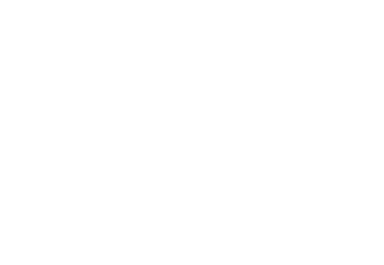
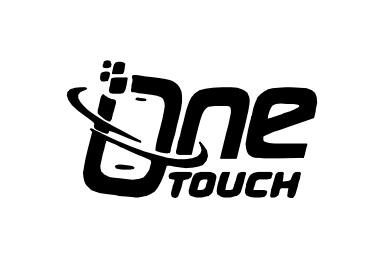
part: none -> (192, 129)

